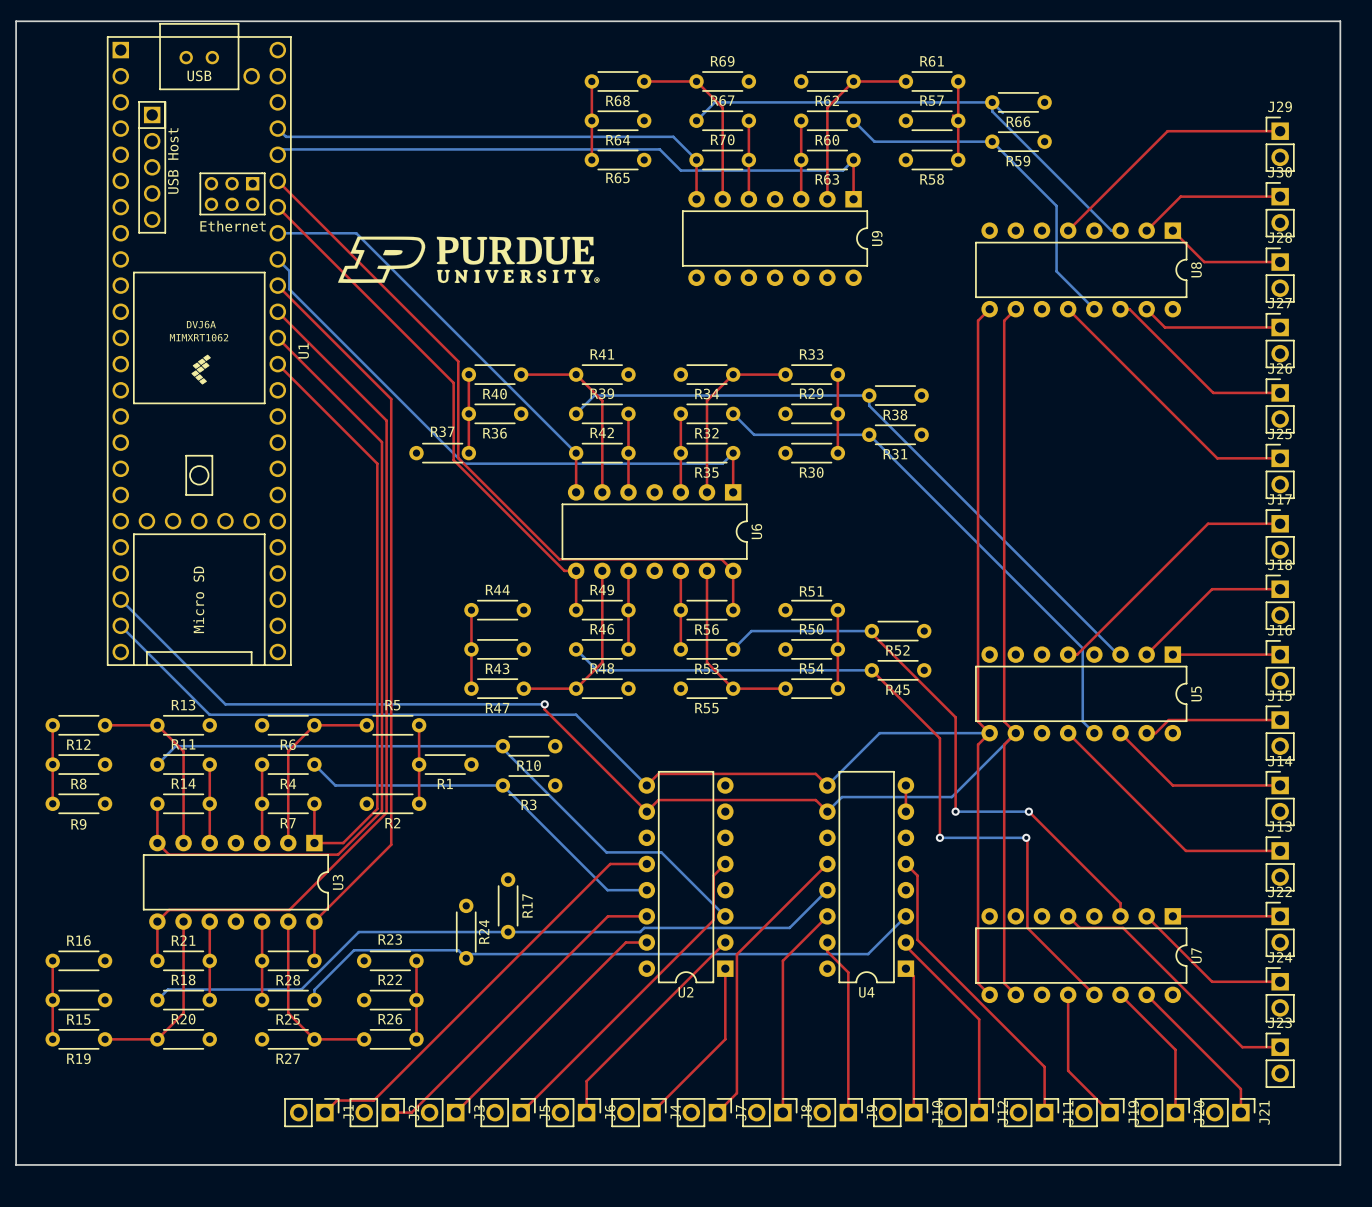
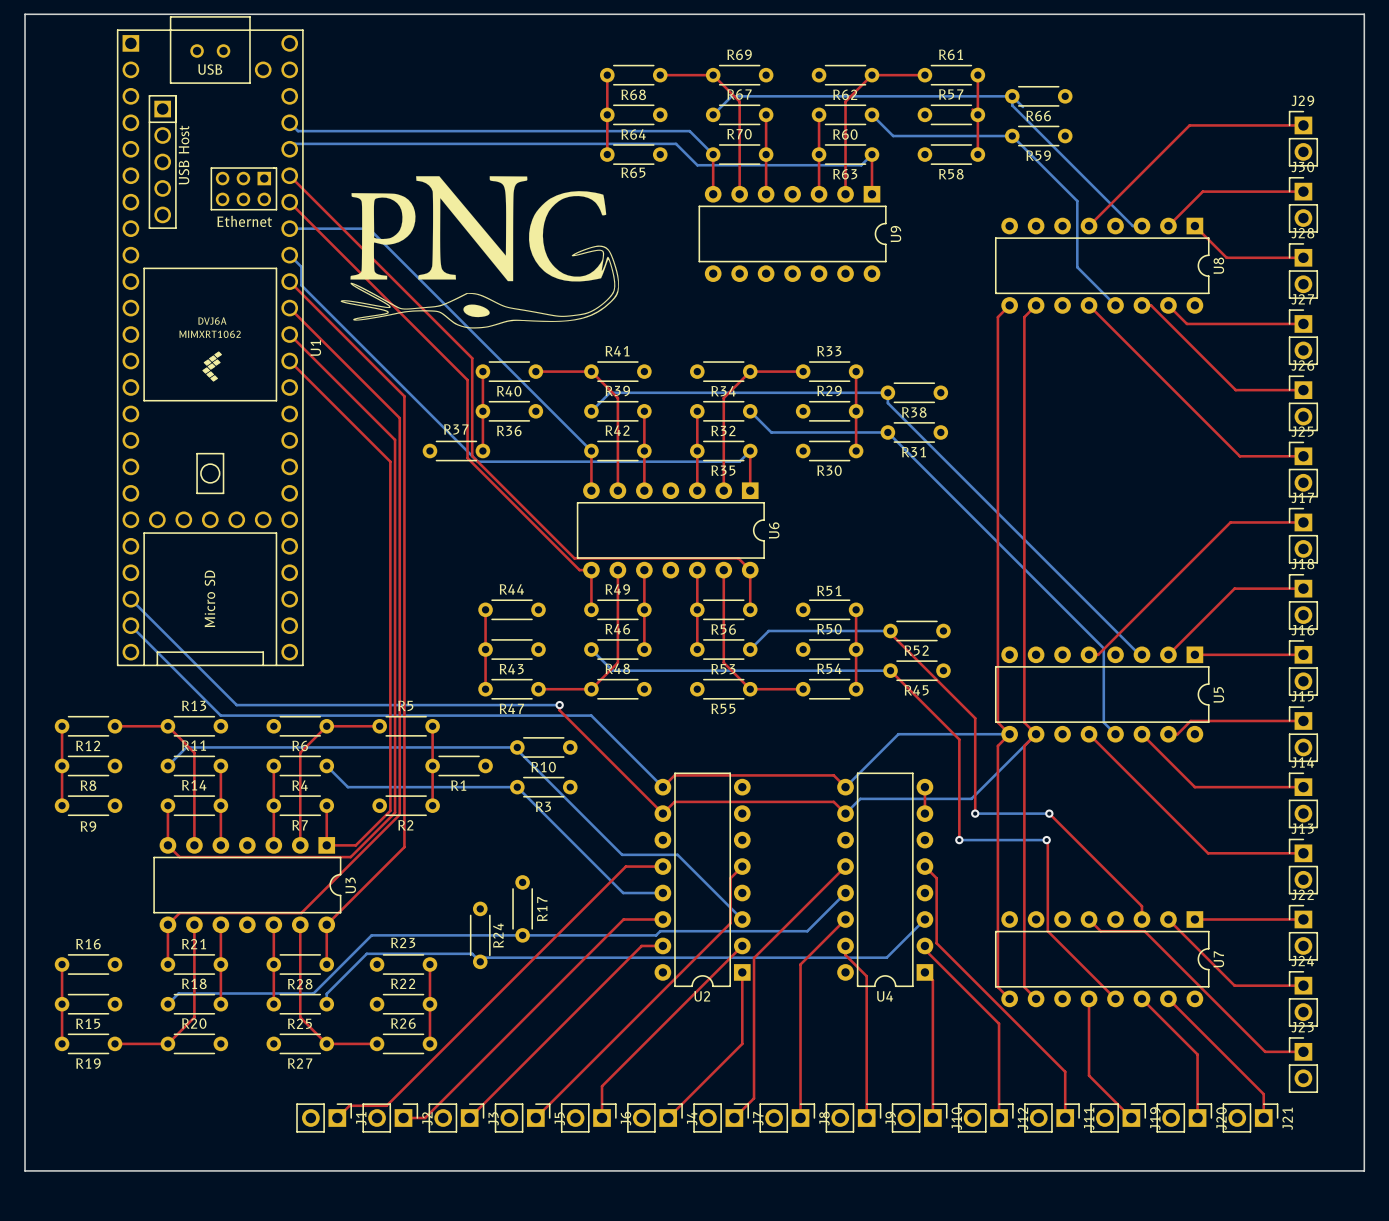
drawing shape: [337, 236, 600, 284] -> [340, 176, 619, 329]

